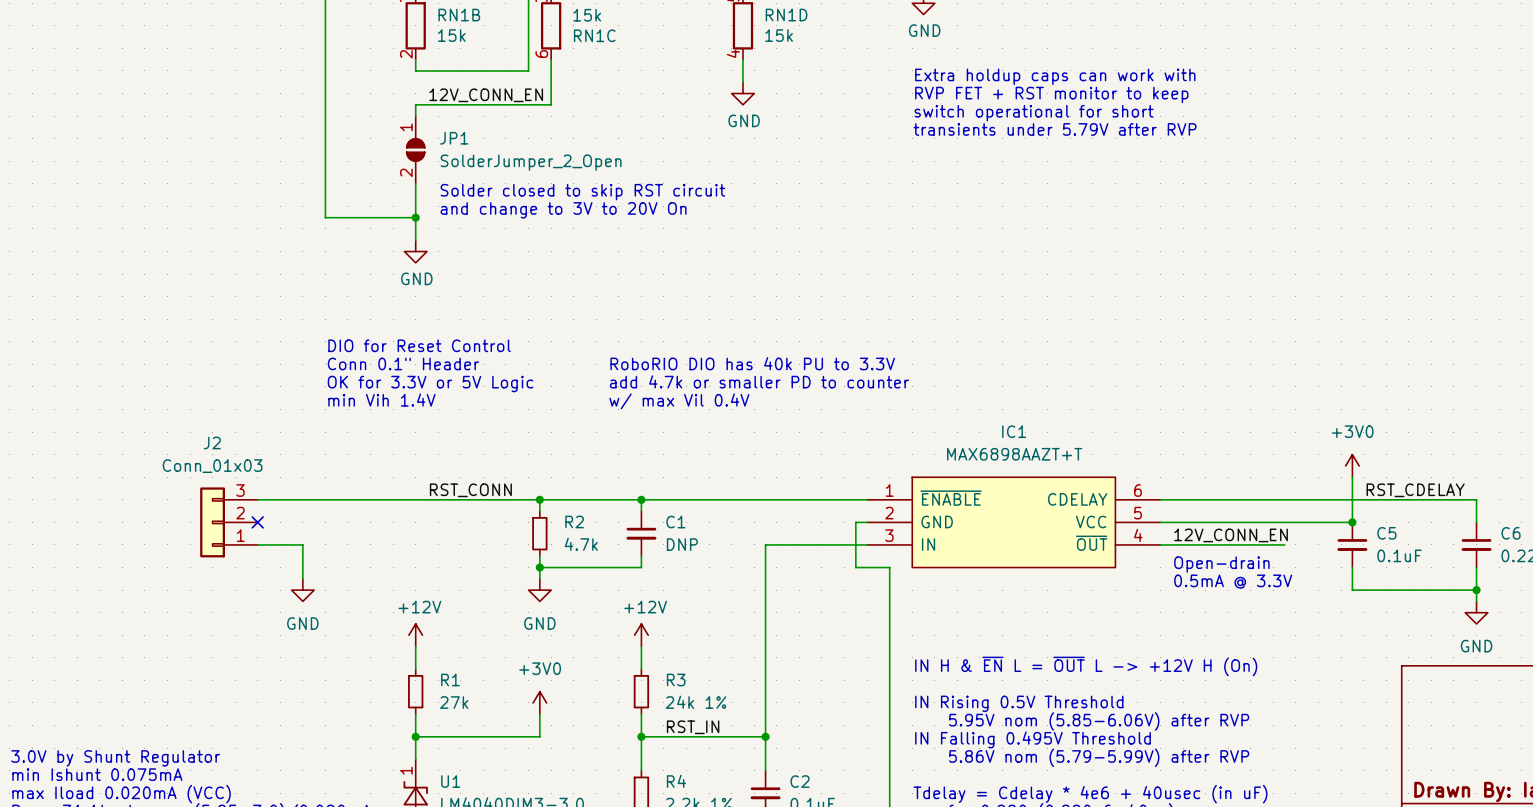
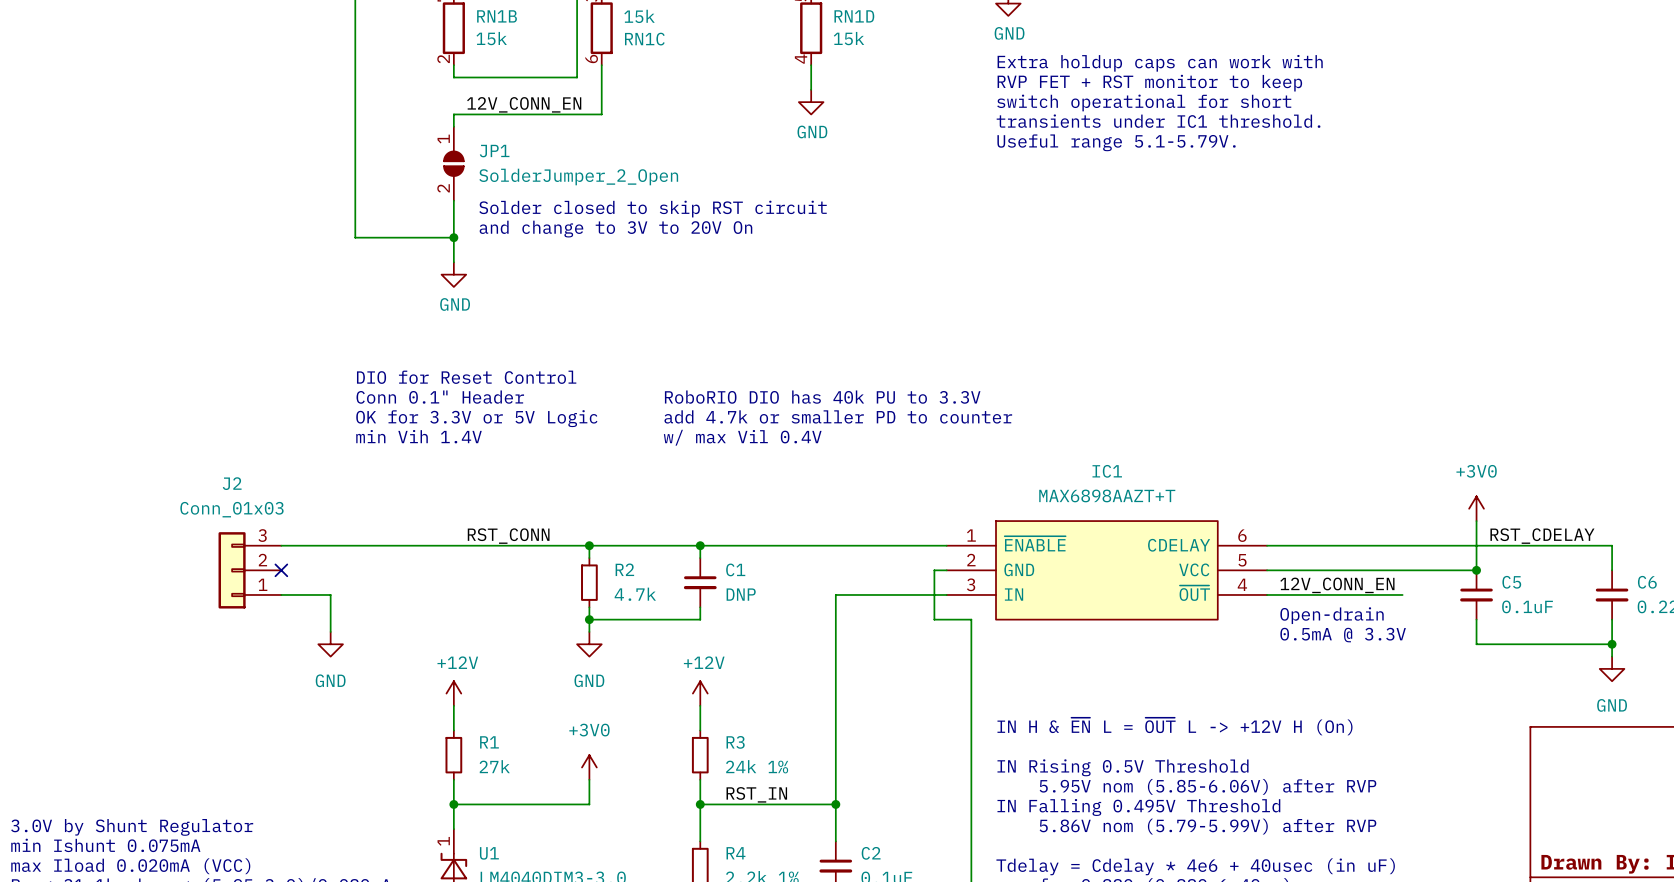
text: none -> Extra holdup caps can work with (1160, 63)
text: Extra holdup caps can work with (1055, 76) -> RVP FET + RST monitor to keep (1149, 83)
text: RVP FET + RST monitor to keep (1051, 94) -> switch operational for short (1144, 102)
text: switch operational for short (1034, 113) -> transients under IC1 threshold. (1158, 121)
text: transients under 5.79V after RVP (1055, 129) -> Useful range 5.1-5.79V. (1116, 142)

